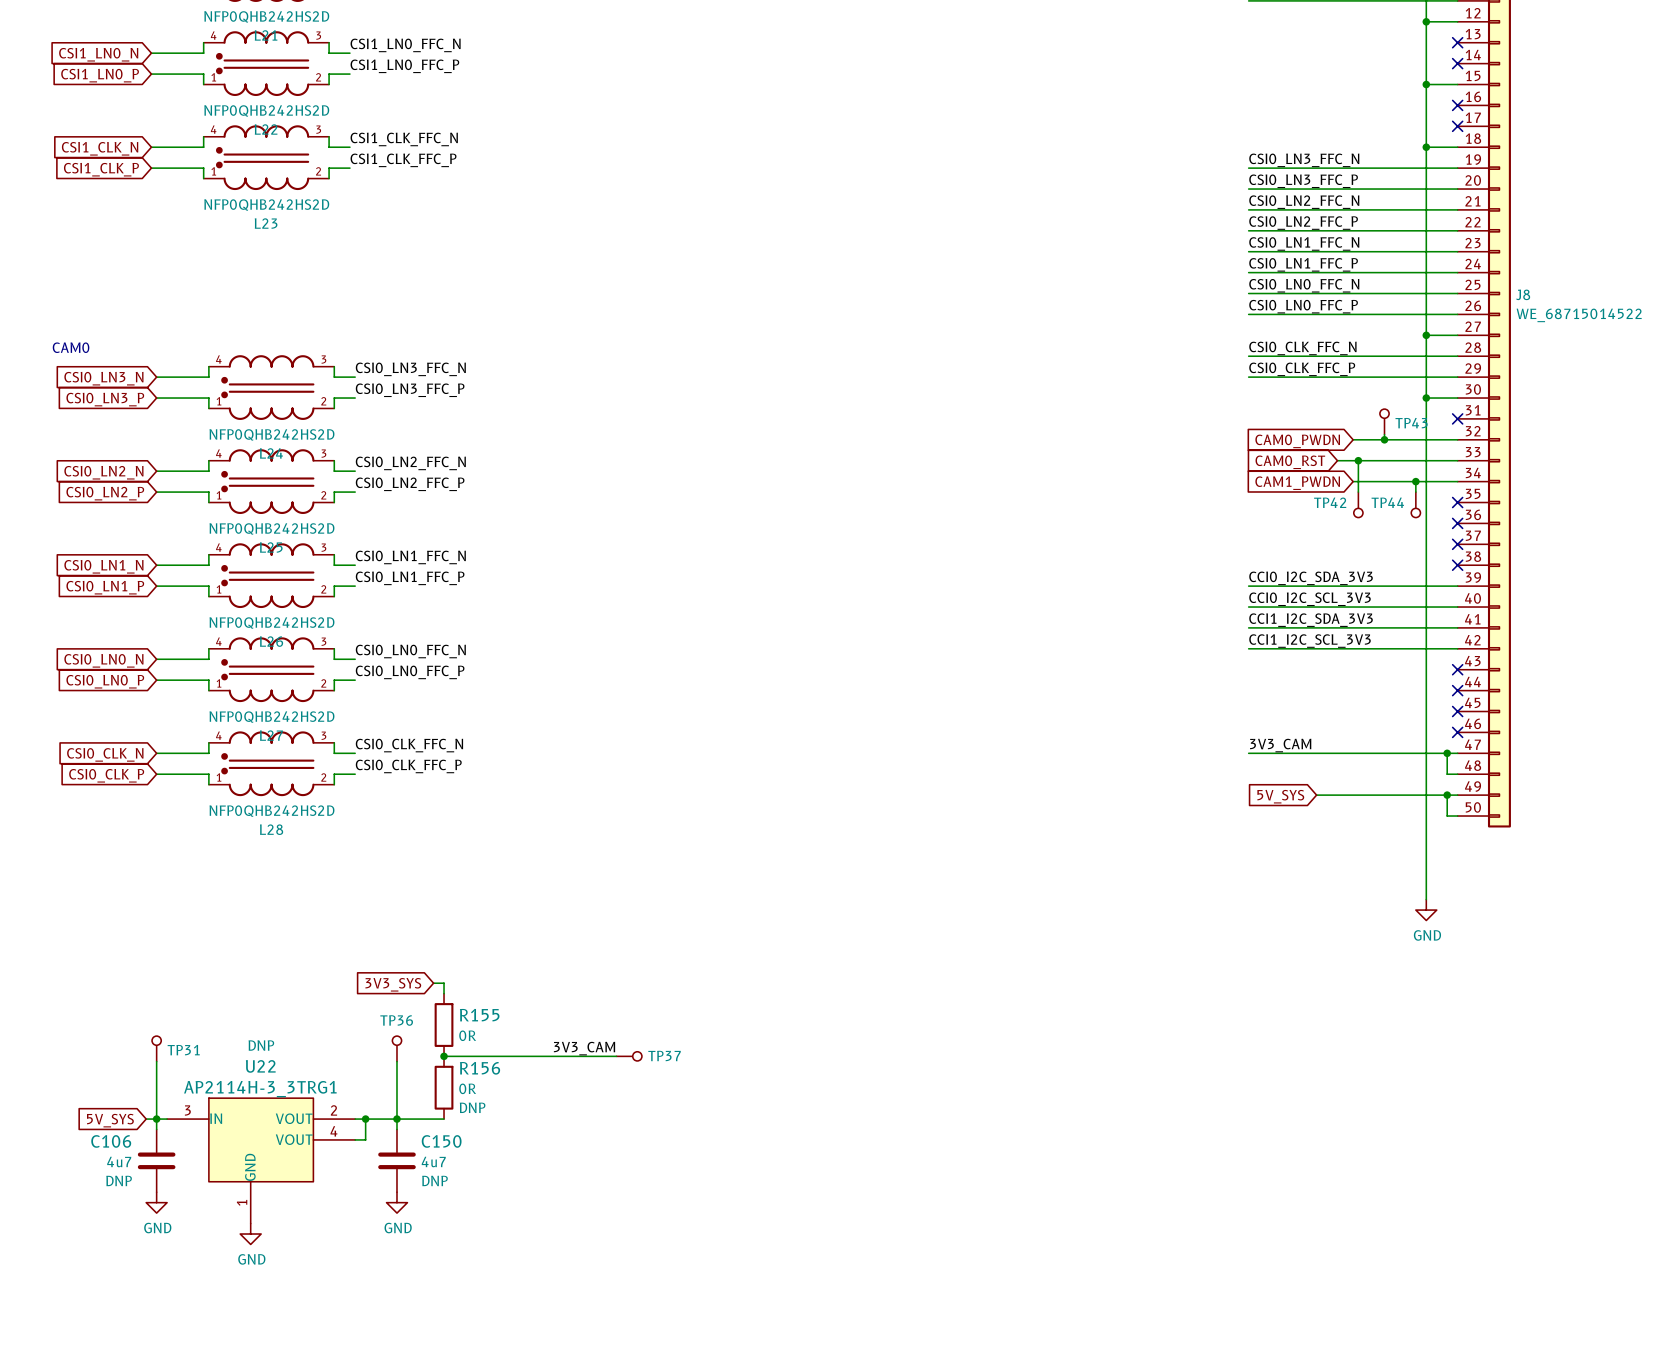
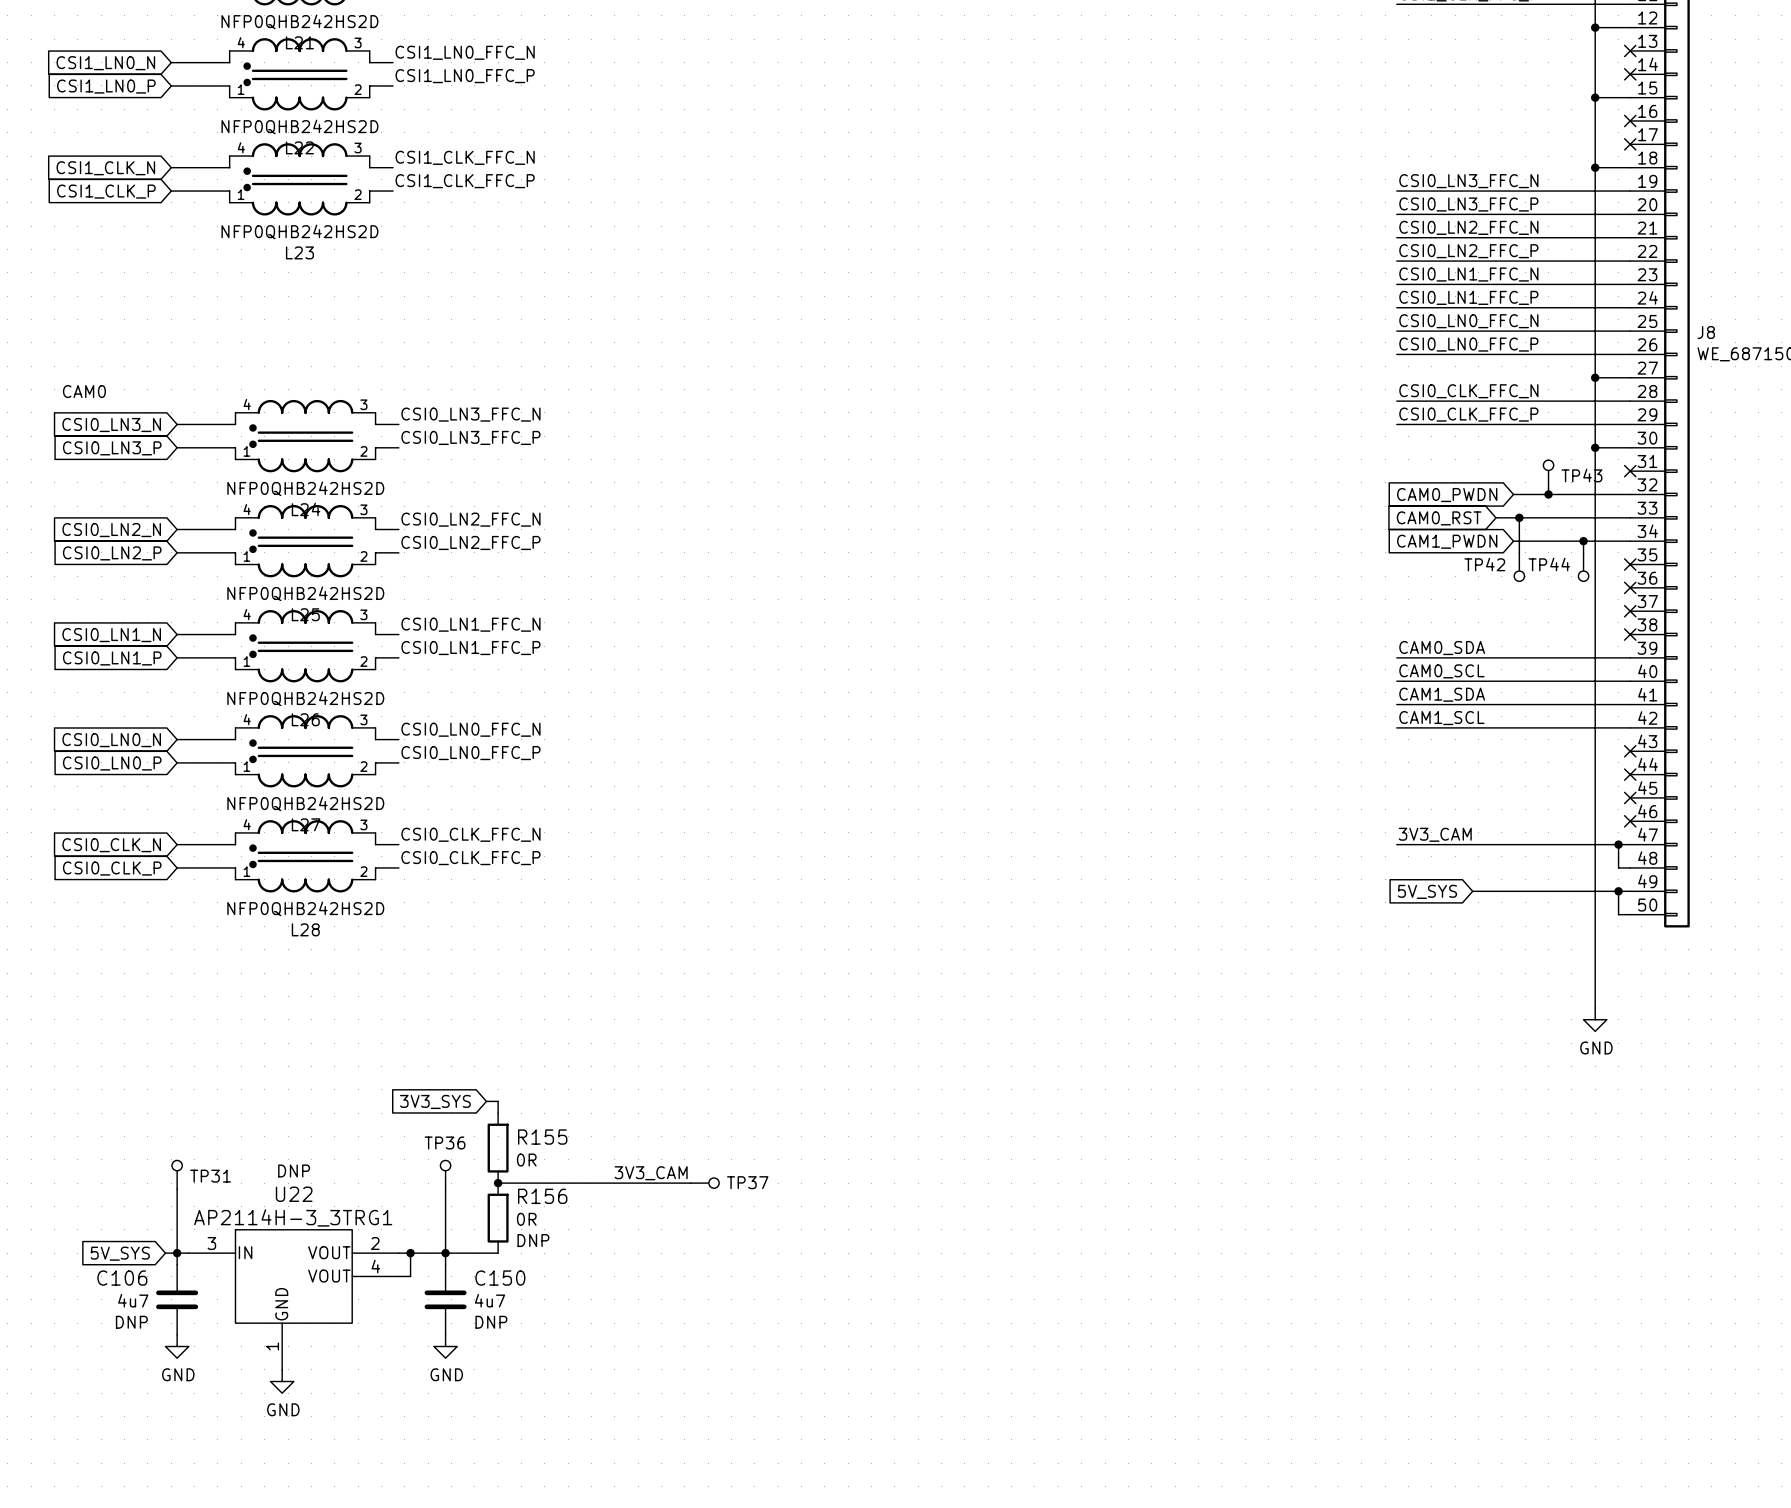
label: CCI0_I2C_SDA_3V3 (1311, 578) -> CAM0_SDA (1442, 648)
label: CCI0_I2C_SCL_3V3 (1310, 599) -> CAM0_SCL (1441, 671)
label: CCI1_I2C_SDA_3V3 (1311, 620) -> CAM1_SDA (1442, 694)
label: CCI1_I2C_SCL_3V3 (1310, 641) -> CAM1_SCL (1441, 718)

